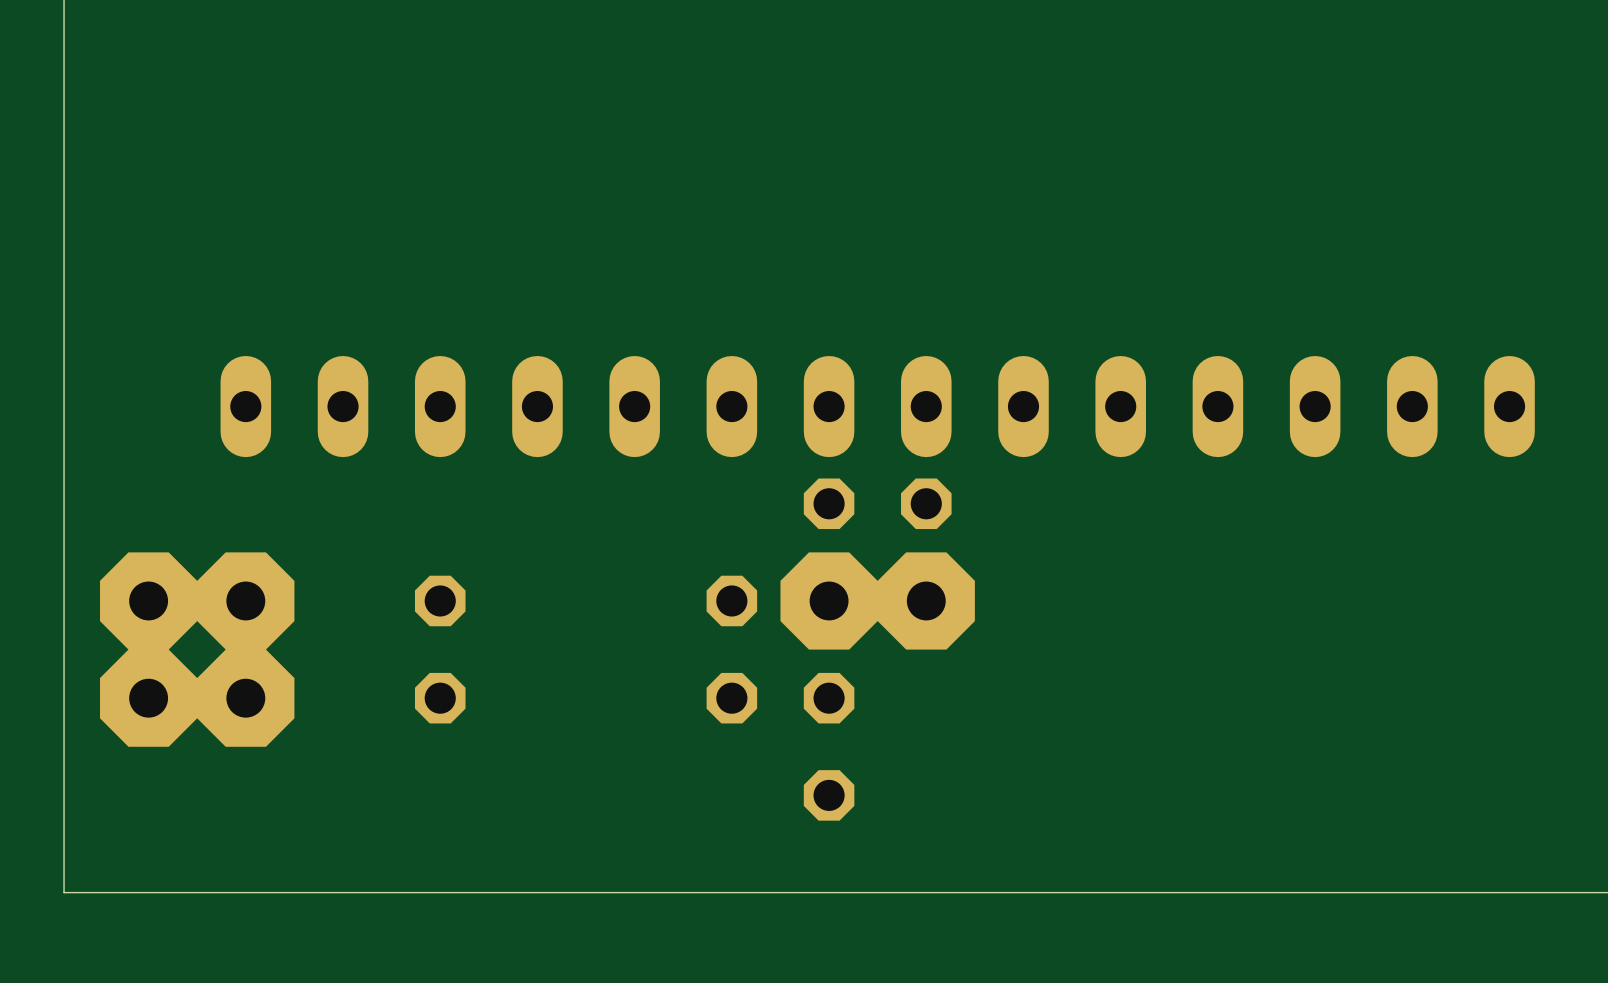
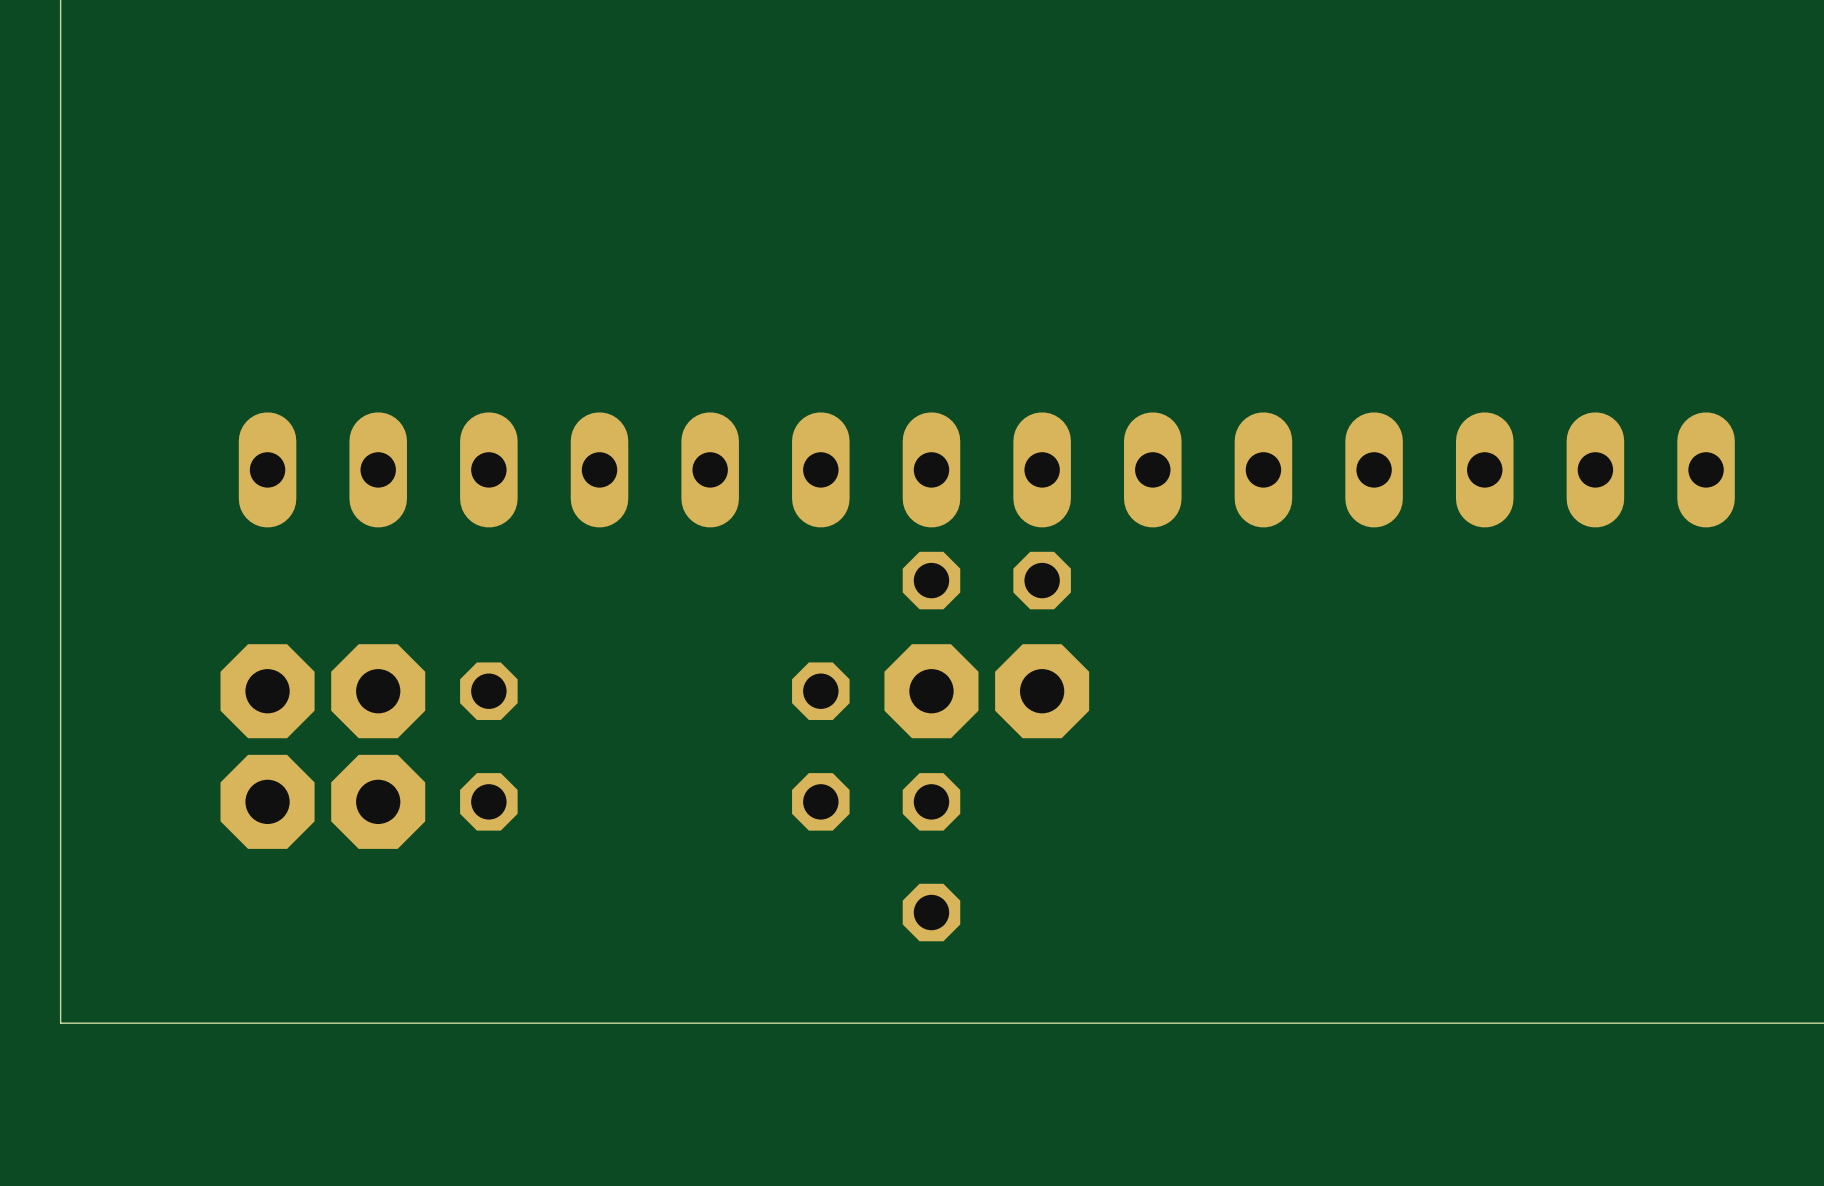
part footprint: [197, 552, 295, 650] -> [220, 644, 315, 739]
part footprint: [780, 552, 878, 650] -> [884, 644, 979, 739]
part footprint: [877, 552, 975, 650] -> [995, 644, 1090, 739]
part: (148, 600) -> none
part: none -> (378, 691)
part footprint: [197, 649, 295, 747] -> [220, 754, 315, 849]
part: (148, 698) -> none
part: none -> (378, 801)

